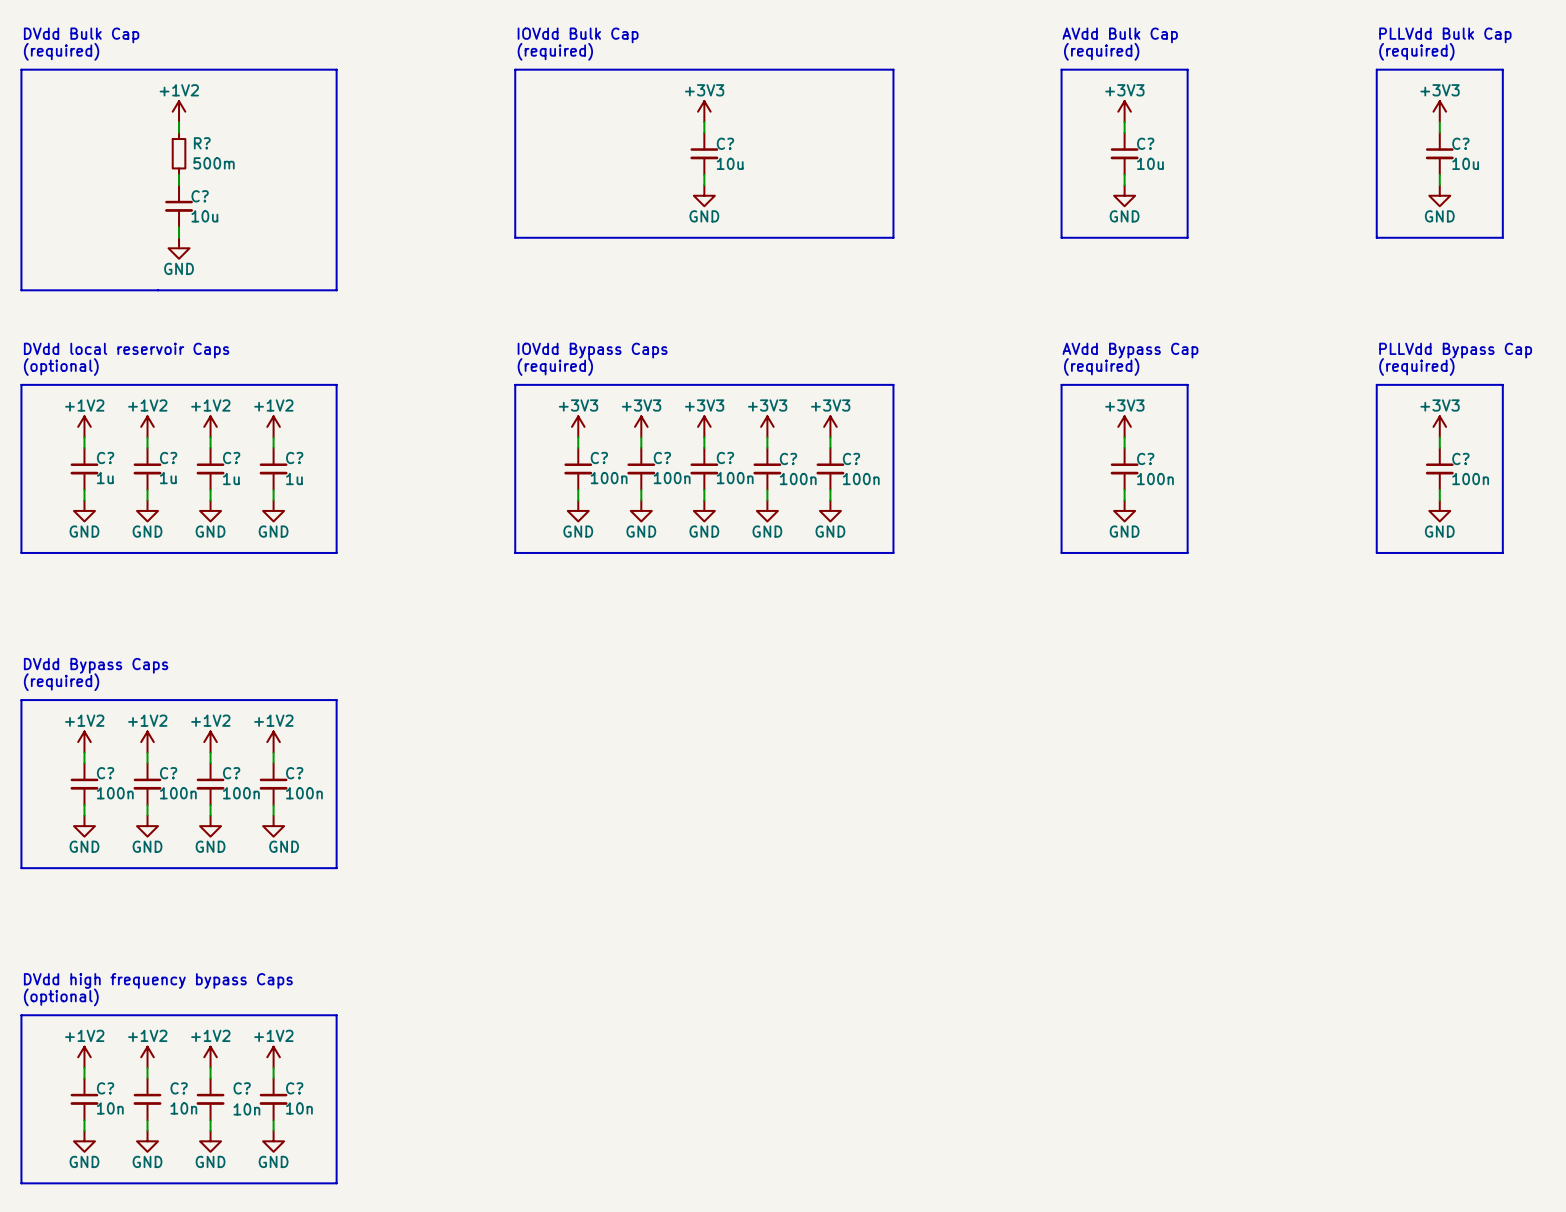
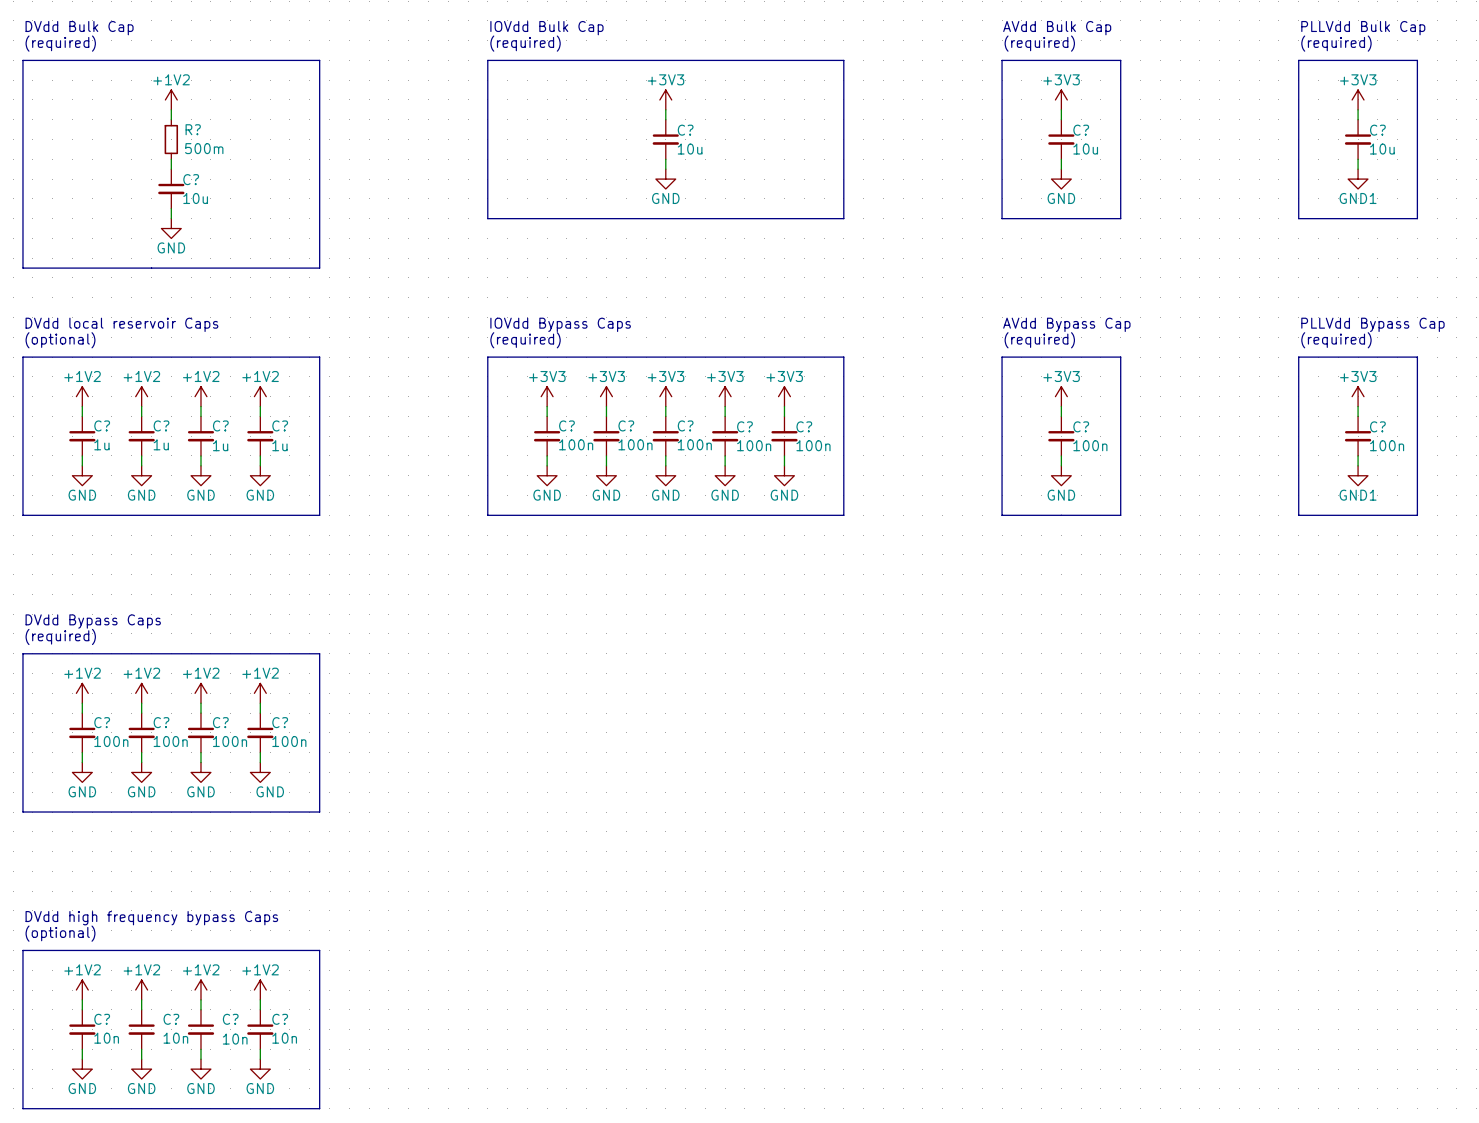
power symbol: GND (1439, 195) -> GND1 (1358, 179)
power symbol: GND (1439, 510) -> GND1 (1358, 475)

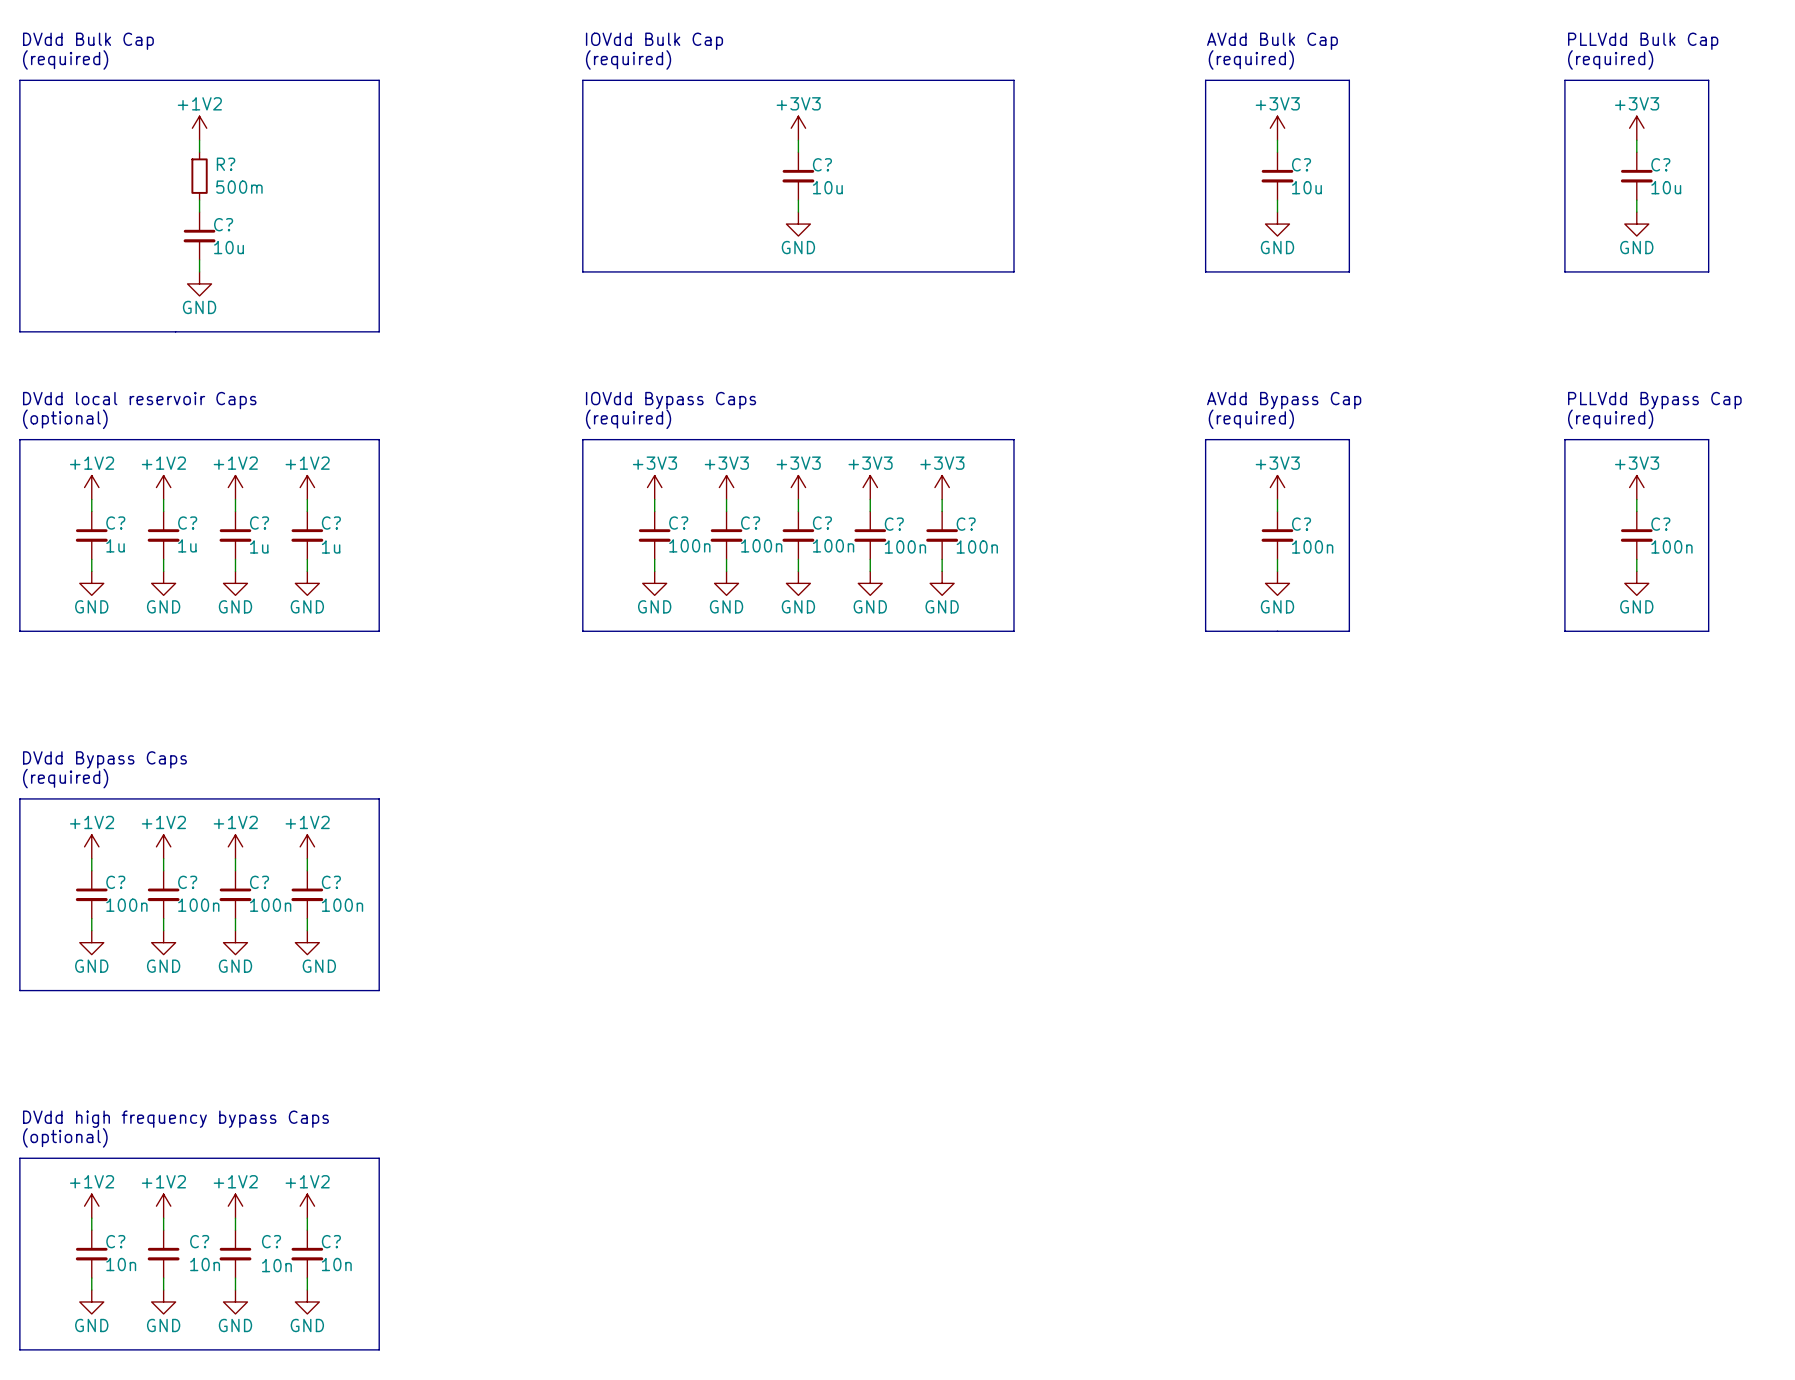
power symbol: GND1 (1358, 179) -> GND (1636, 224)
power symbol: GND1 (1358, 475) -> GND (1636, 583)

